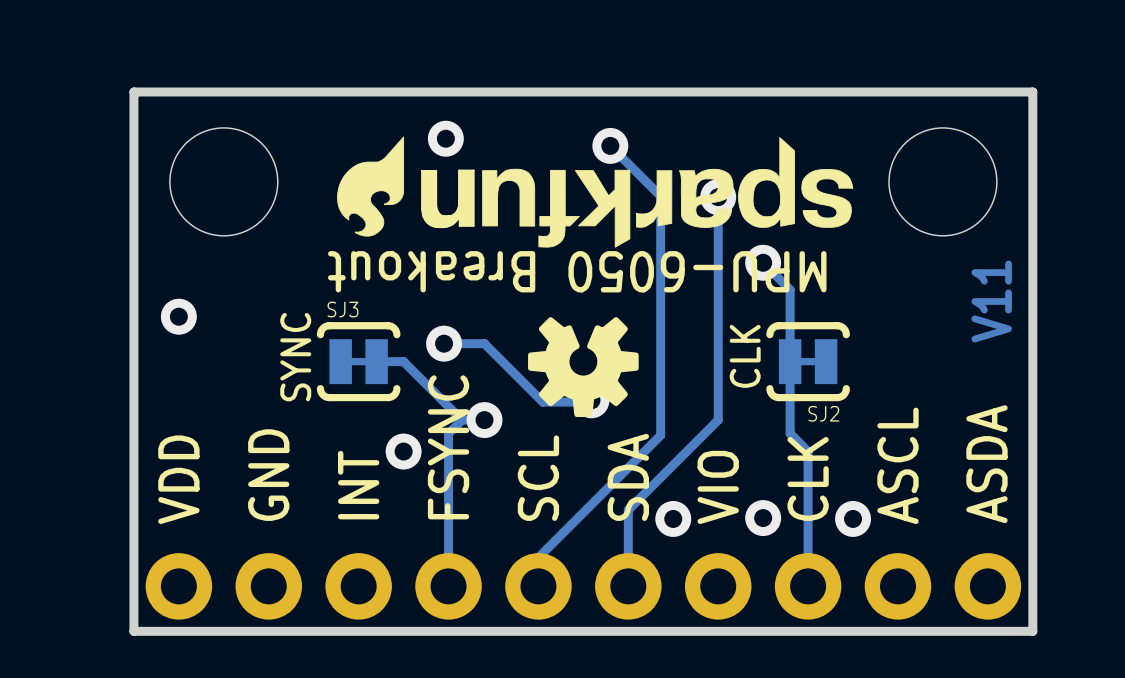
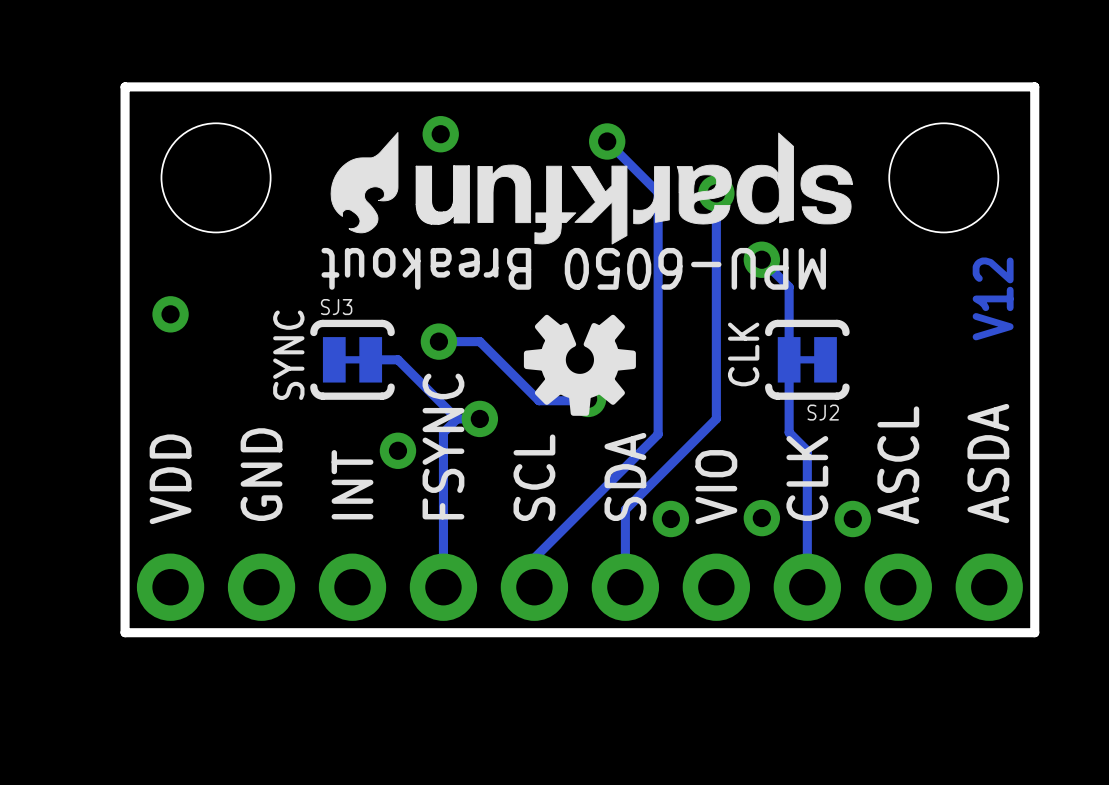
text: V11 (991, 301) -> V12 (993, 298)

